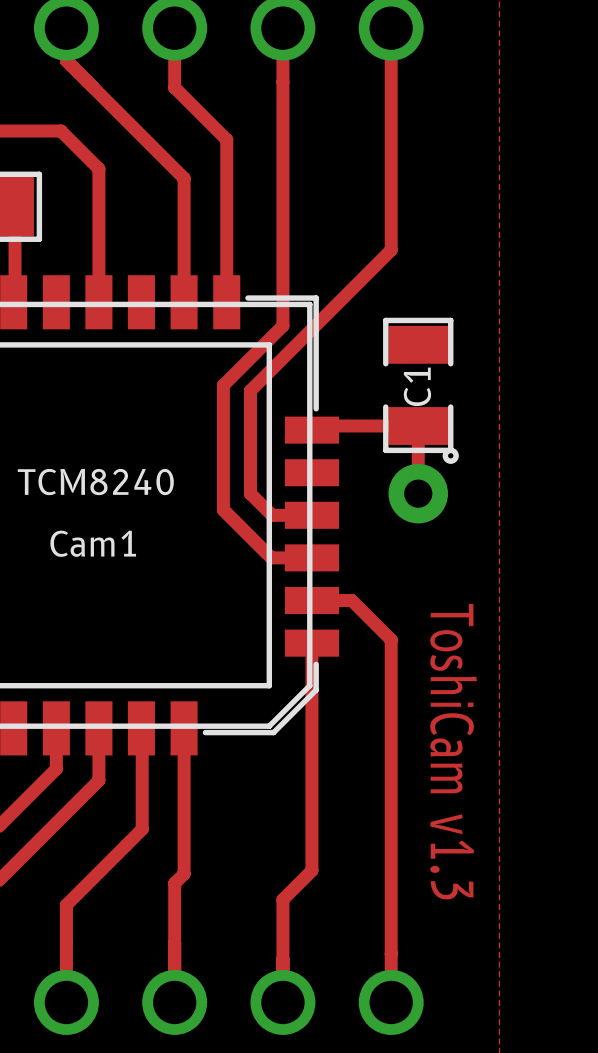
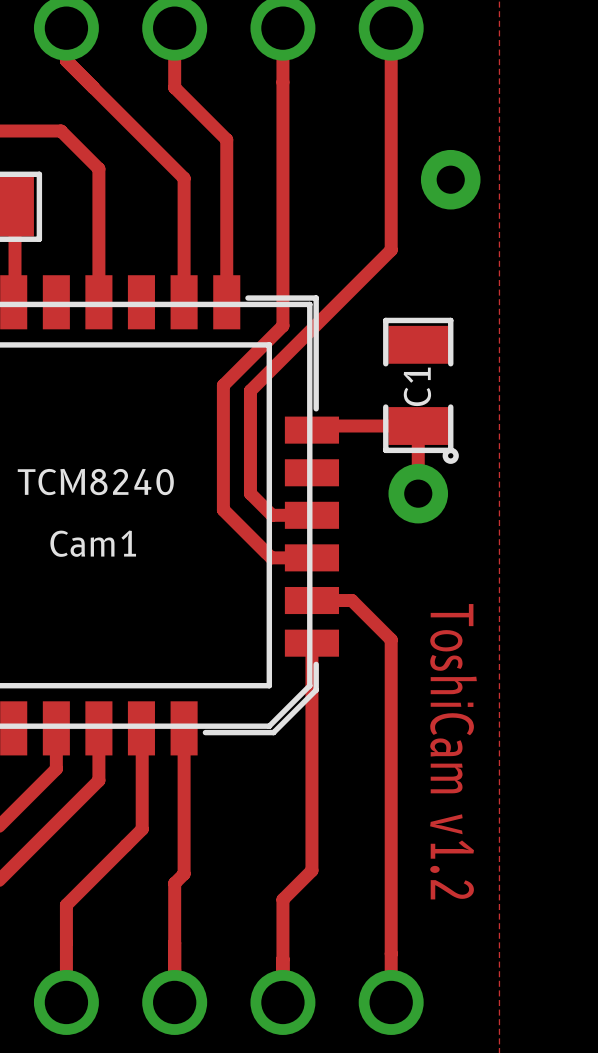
via: none -> (450, 179)
text: ToshiCam v1.3 (453, 751) -> ToshiCam v1.2 (453, 751)

